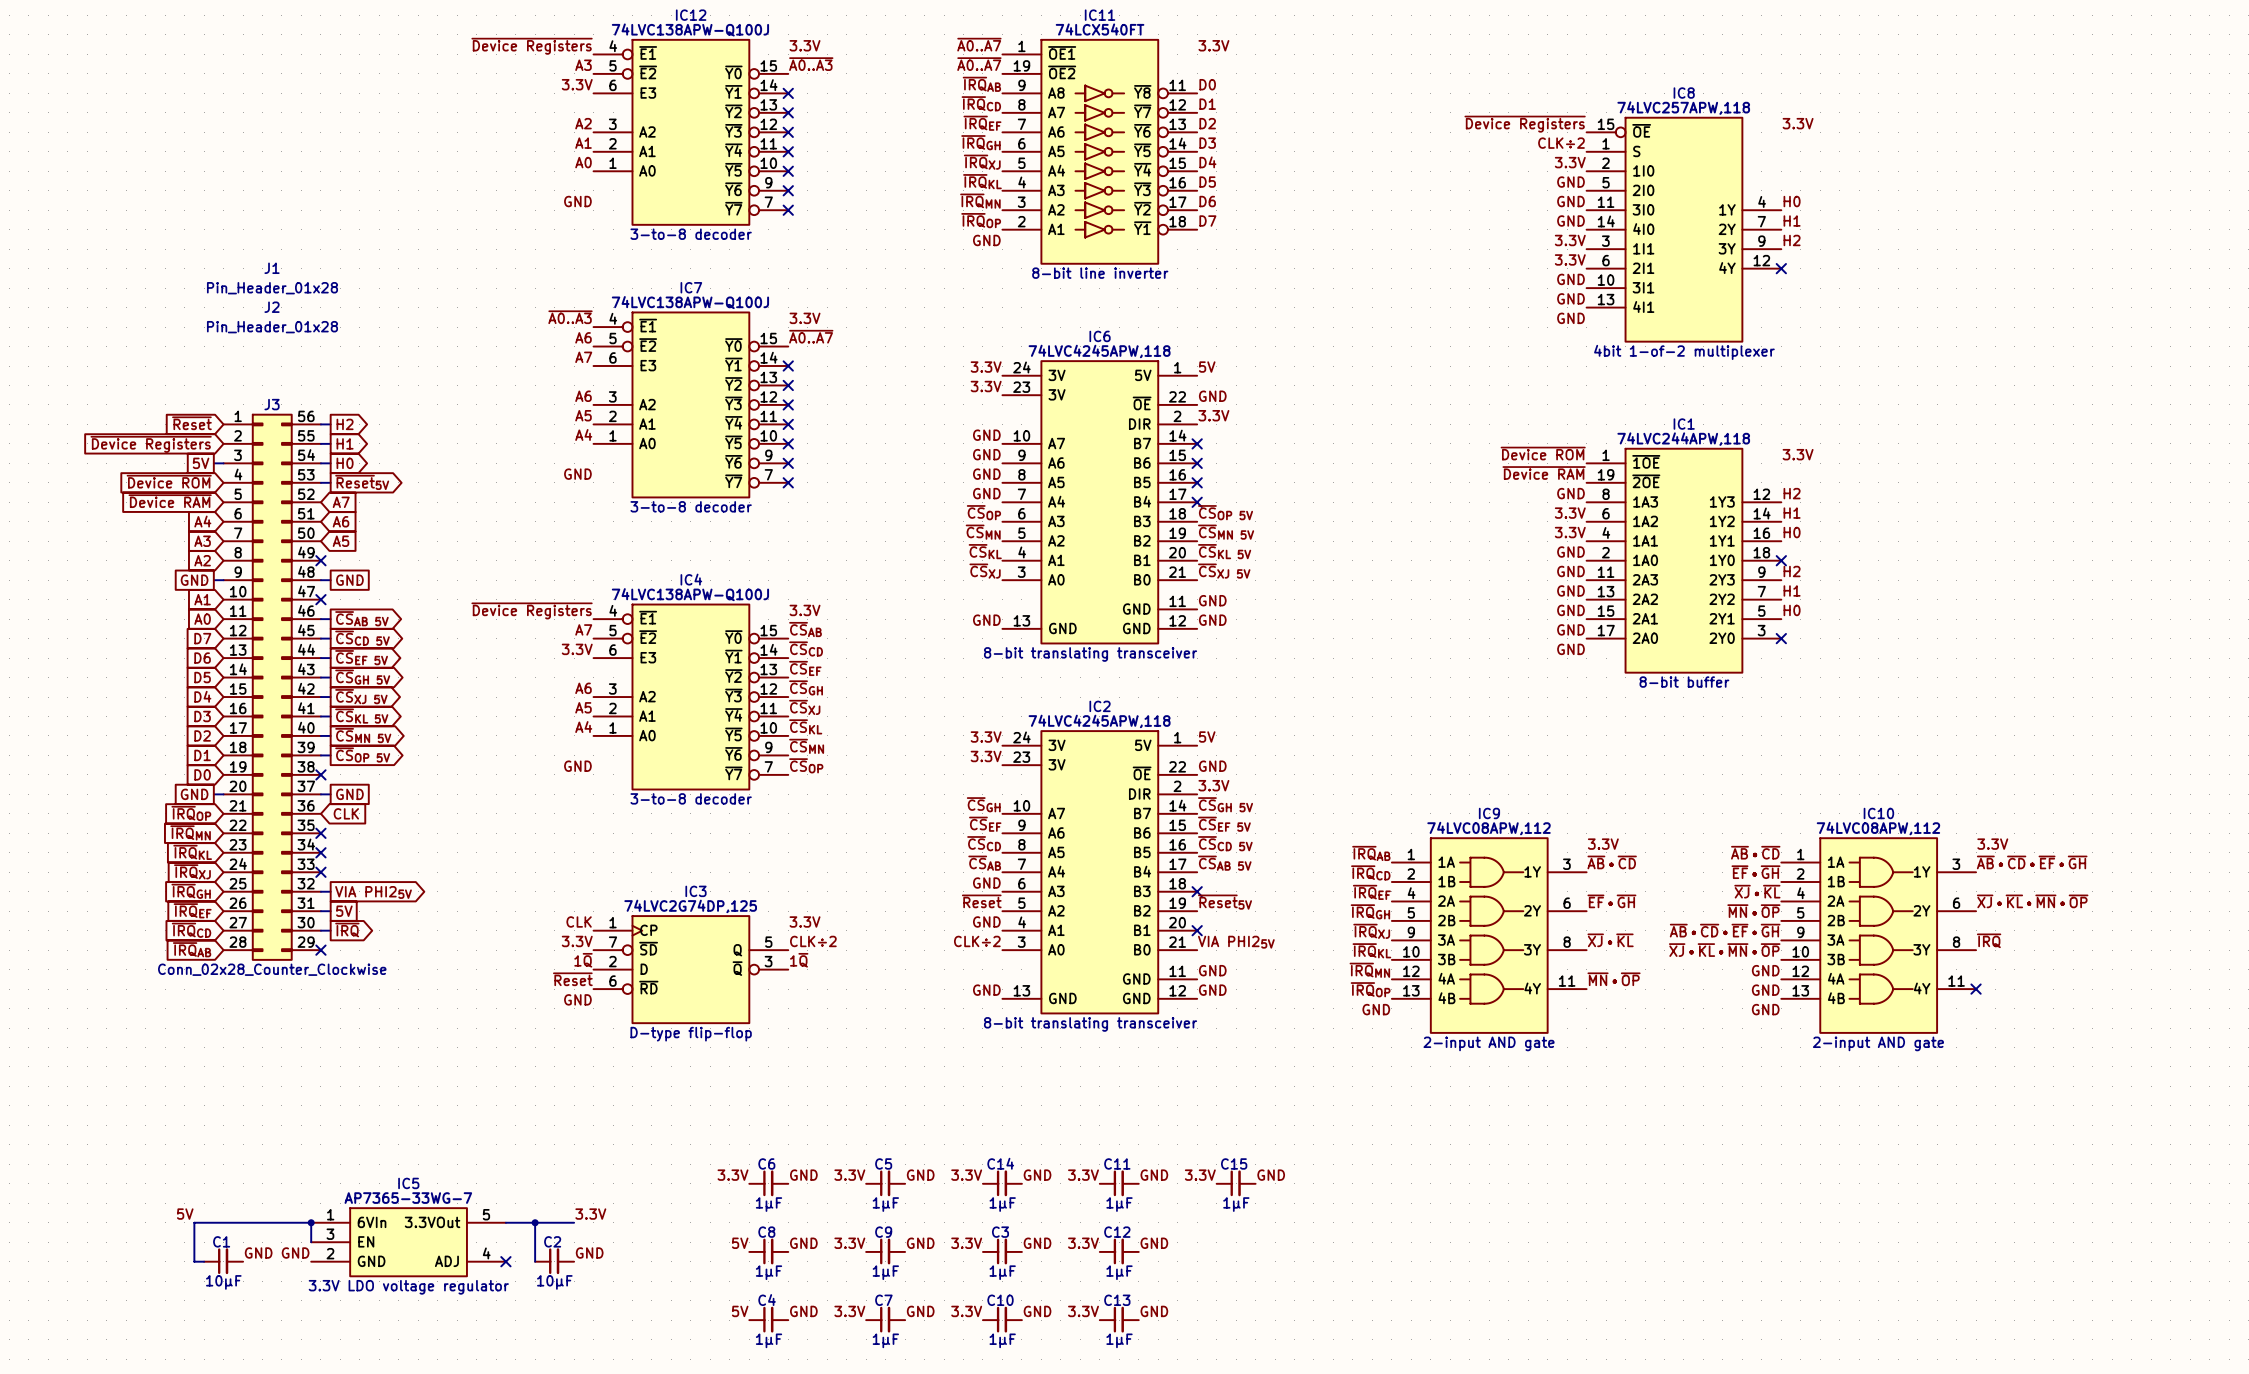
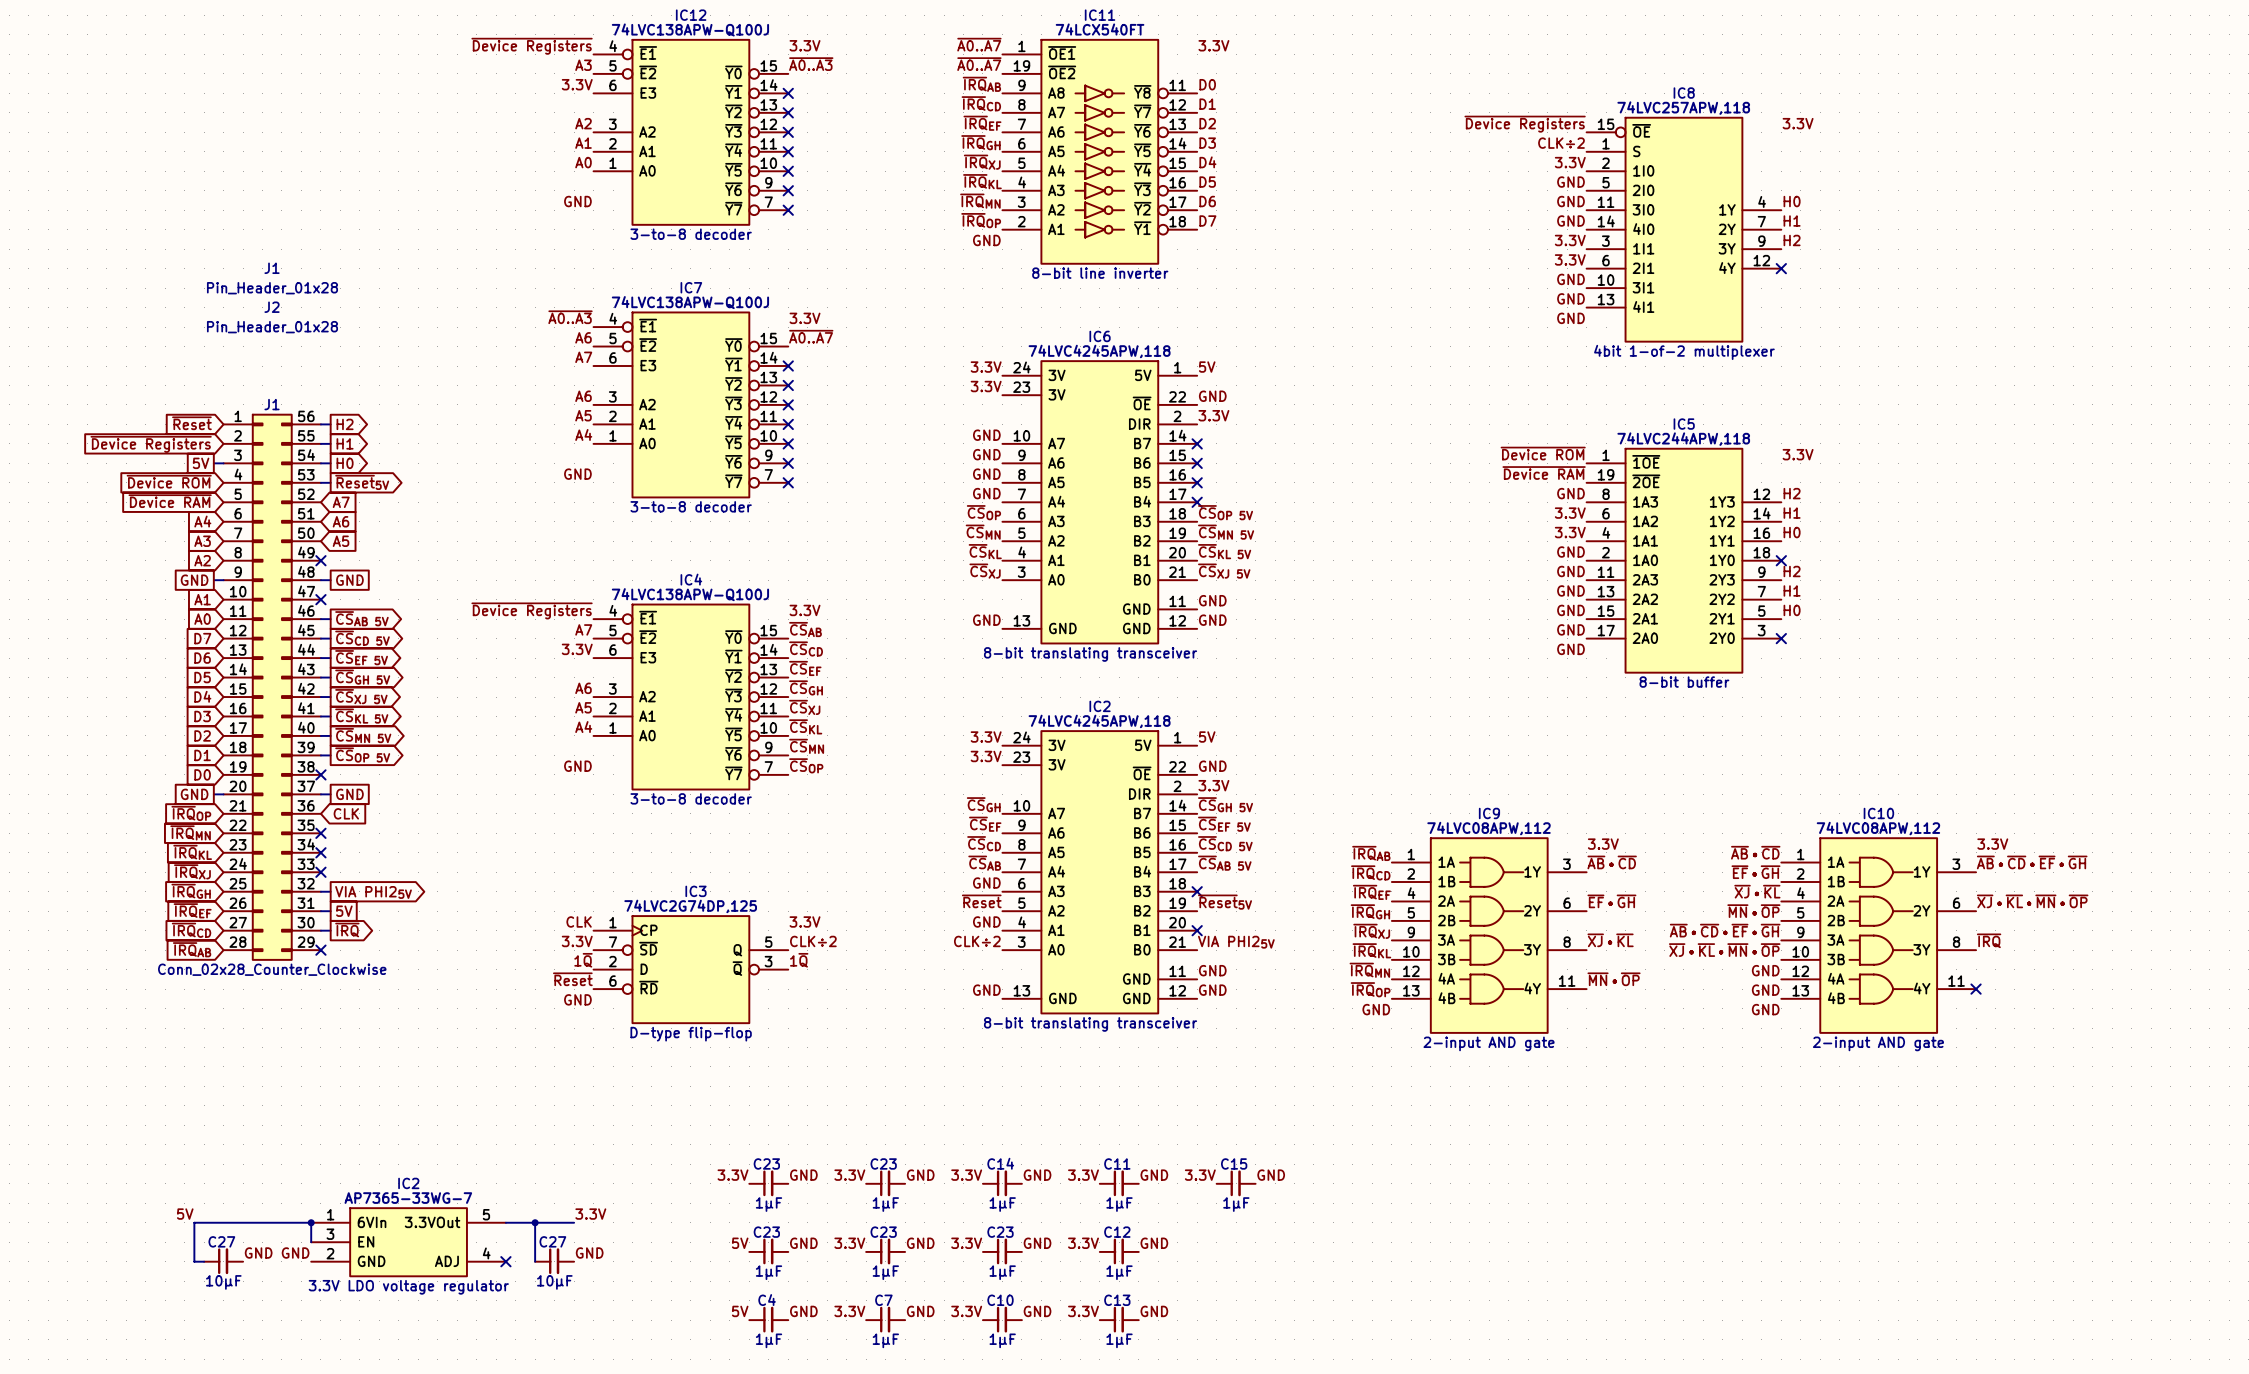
J3 name: J3 (272, 404) -> J1 (272, 404)
IC1 name: IC1 (1684, 424) -> IC5 (1684, 424)
C6 name: C6 (766, 1163) -> C23 (766, 1163)
C5 name: C5 (883, 1163) -> C23 (883, 1163)
IC5 name: IC5 (408, 1183) -> IC2 (408, 1183)
C8 name: C8 (766, 1232) -> C23 (766, 1232)
C9 name: C9 (883, 1232) -> C23 (883, 1232)
C3 name: C3 (1000, 1232) -> C23 (1000, 1232)
C1 name: C1 (221, 1241) -> C27 (221, 1241)
C2 name: C2 (552, 1241) -> C27 (552, 1241)

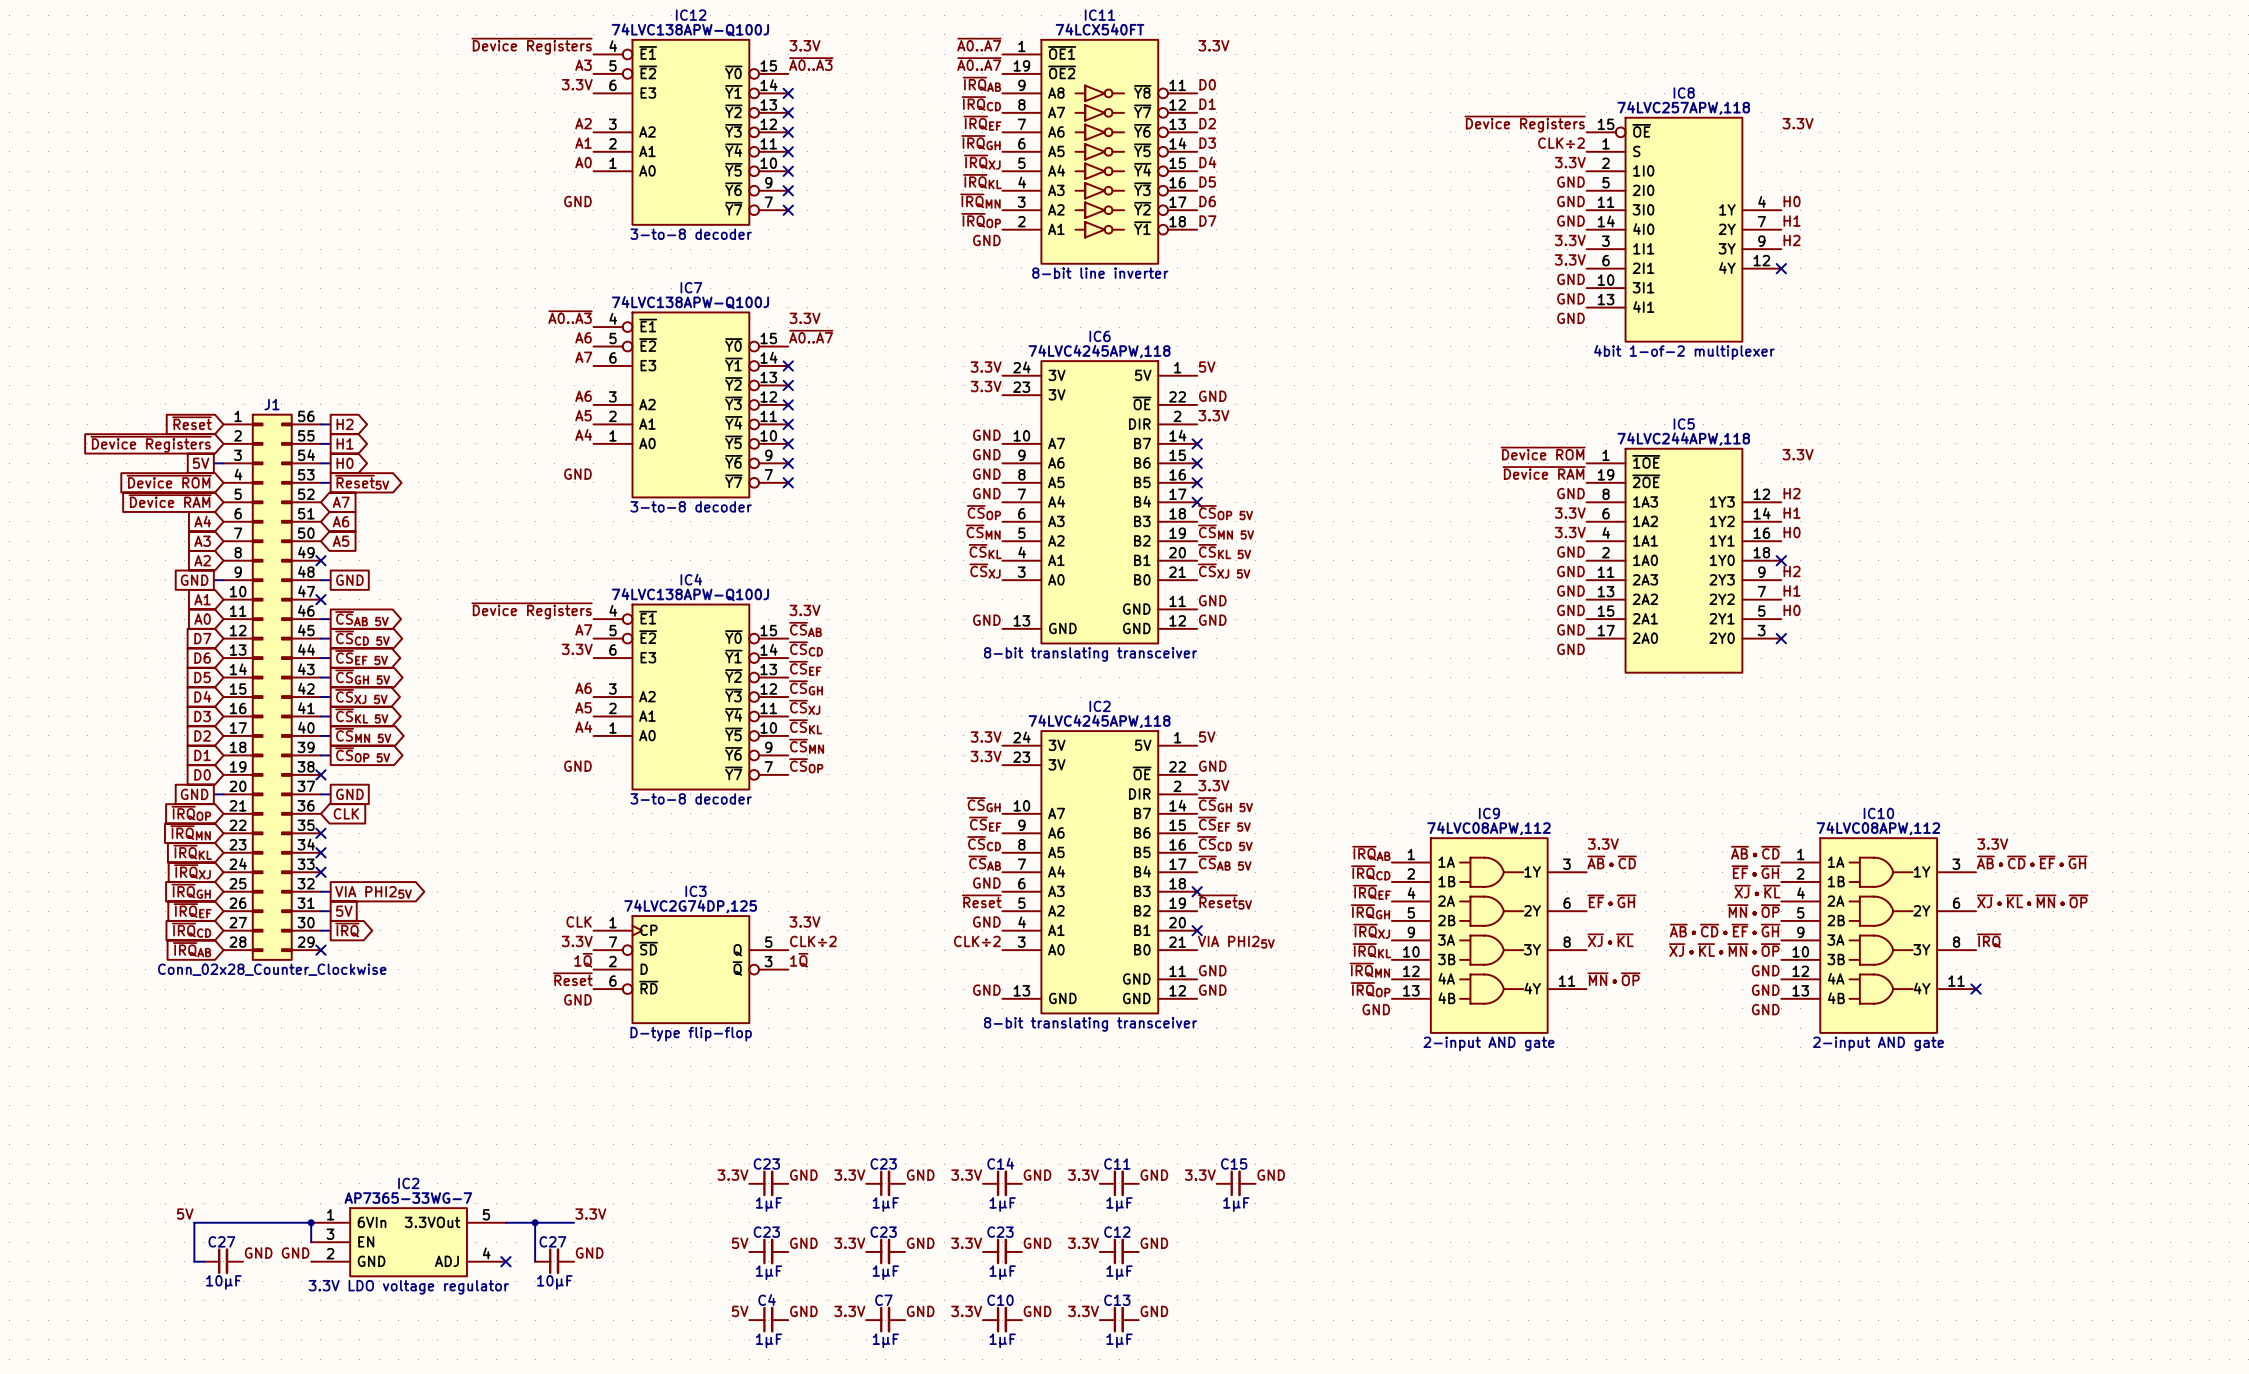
J1: Pin_Header_01x28 (272, 278) -> none
J2: Pin_Header_01x28 (272, 317) -> none
IC5 text: 8-bit buffer (1684, 682) -> none

